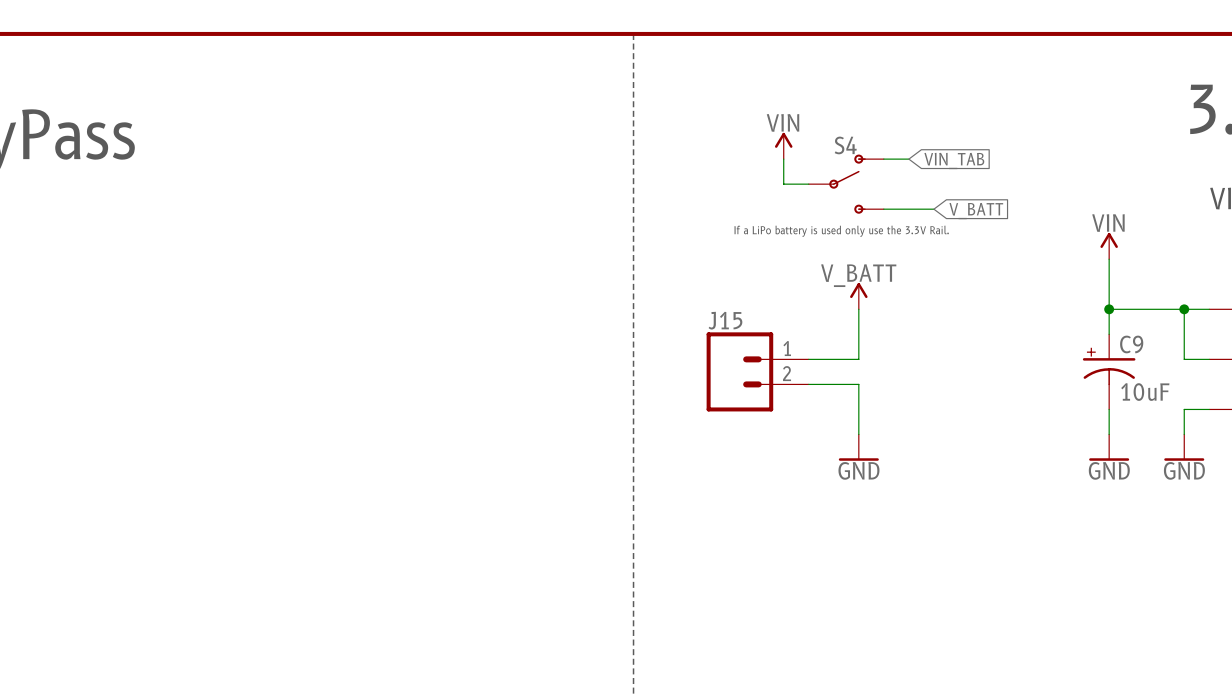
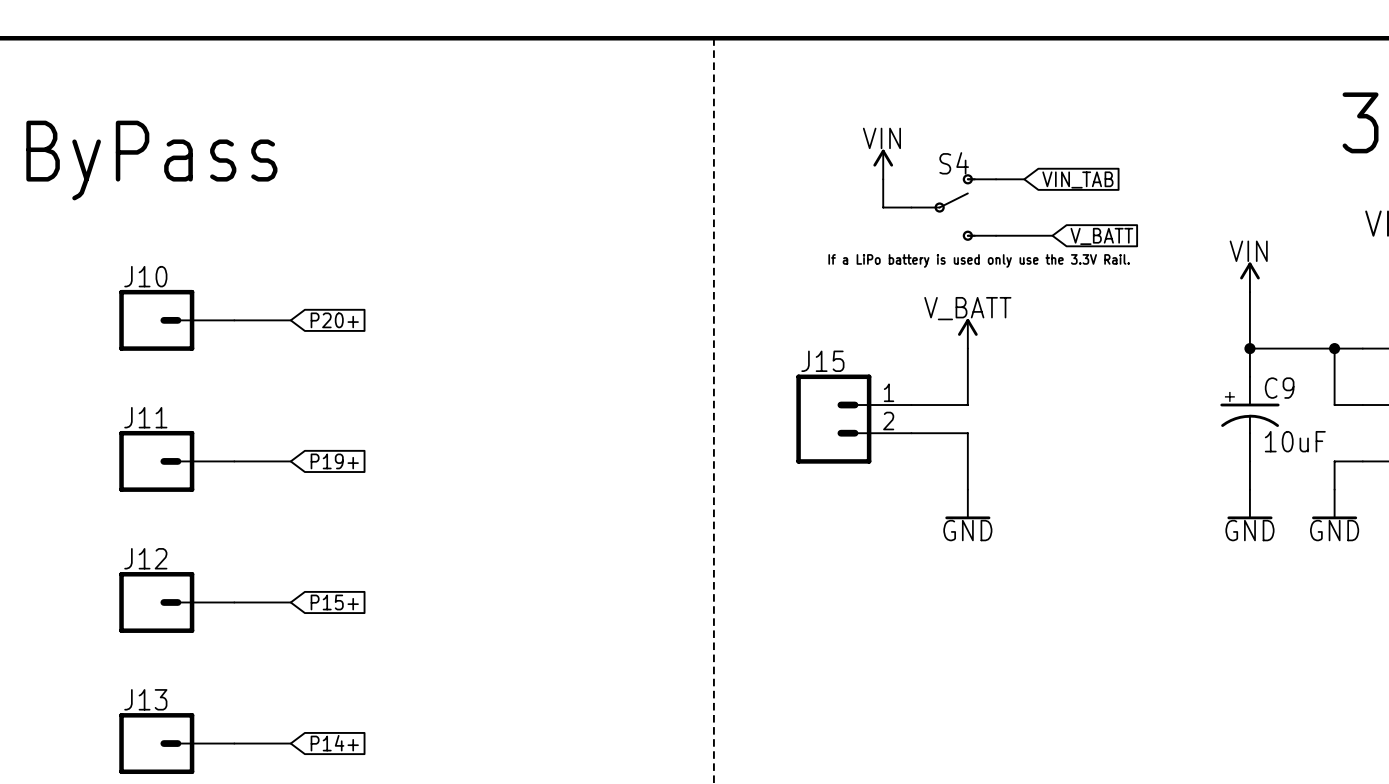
J10: none -> (176, 320)
wire: none -> (234, 320) (290, 320)
global label: none -> P20+ (334, 320)
J11: none -> (176, 461)
wire: none -> (234, 461) (290, 461)
global label: none -> P19+ (334, 461)
J12: none -> (176, 602)
wire: none -> (234, 602) (290, 602)
global label: none -> P15+ (334, 602)
J13: none -> (176, 743)
wire: none -> (234, 743) (290, 743)
global label: none -> P14+ (334, 743)

